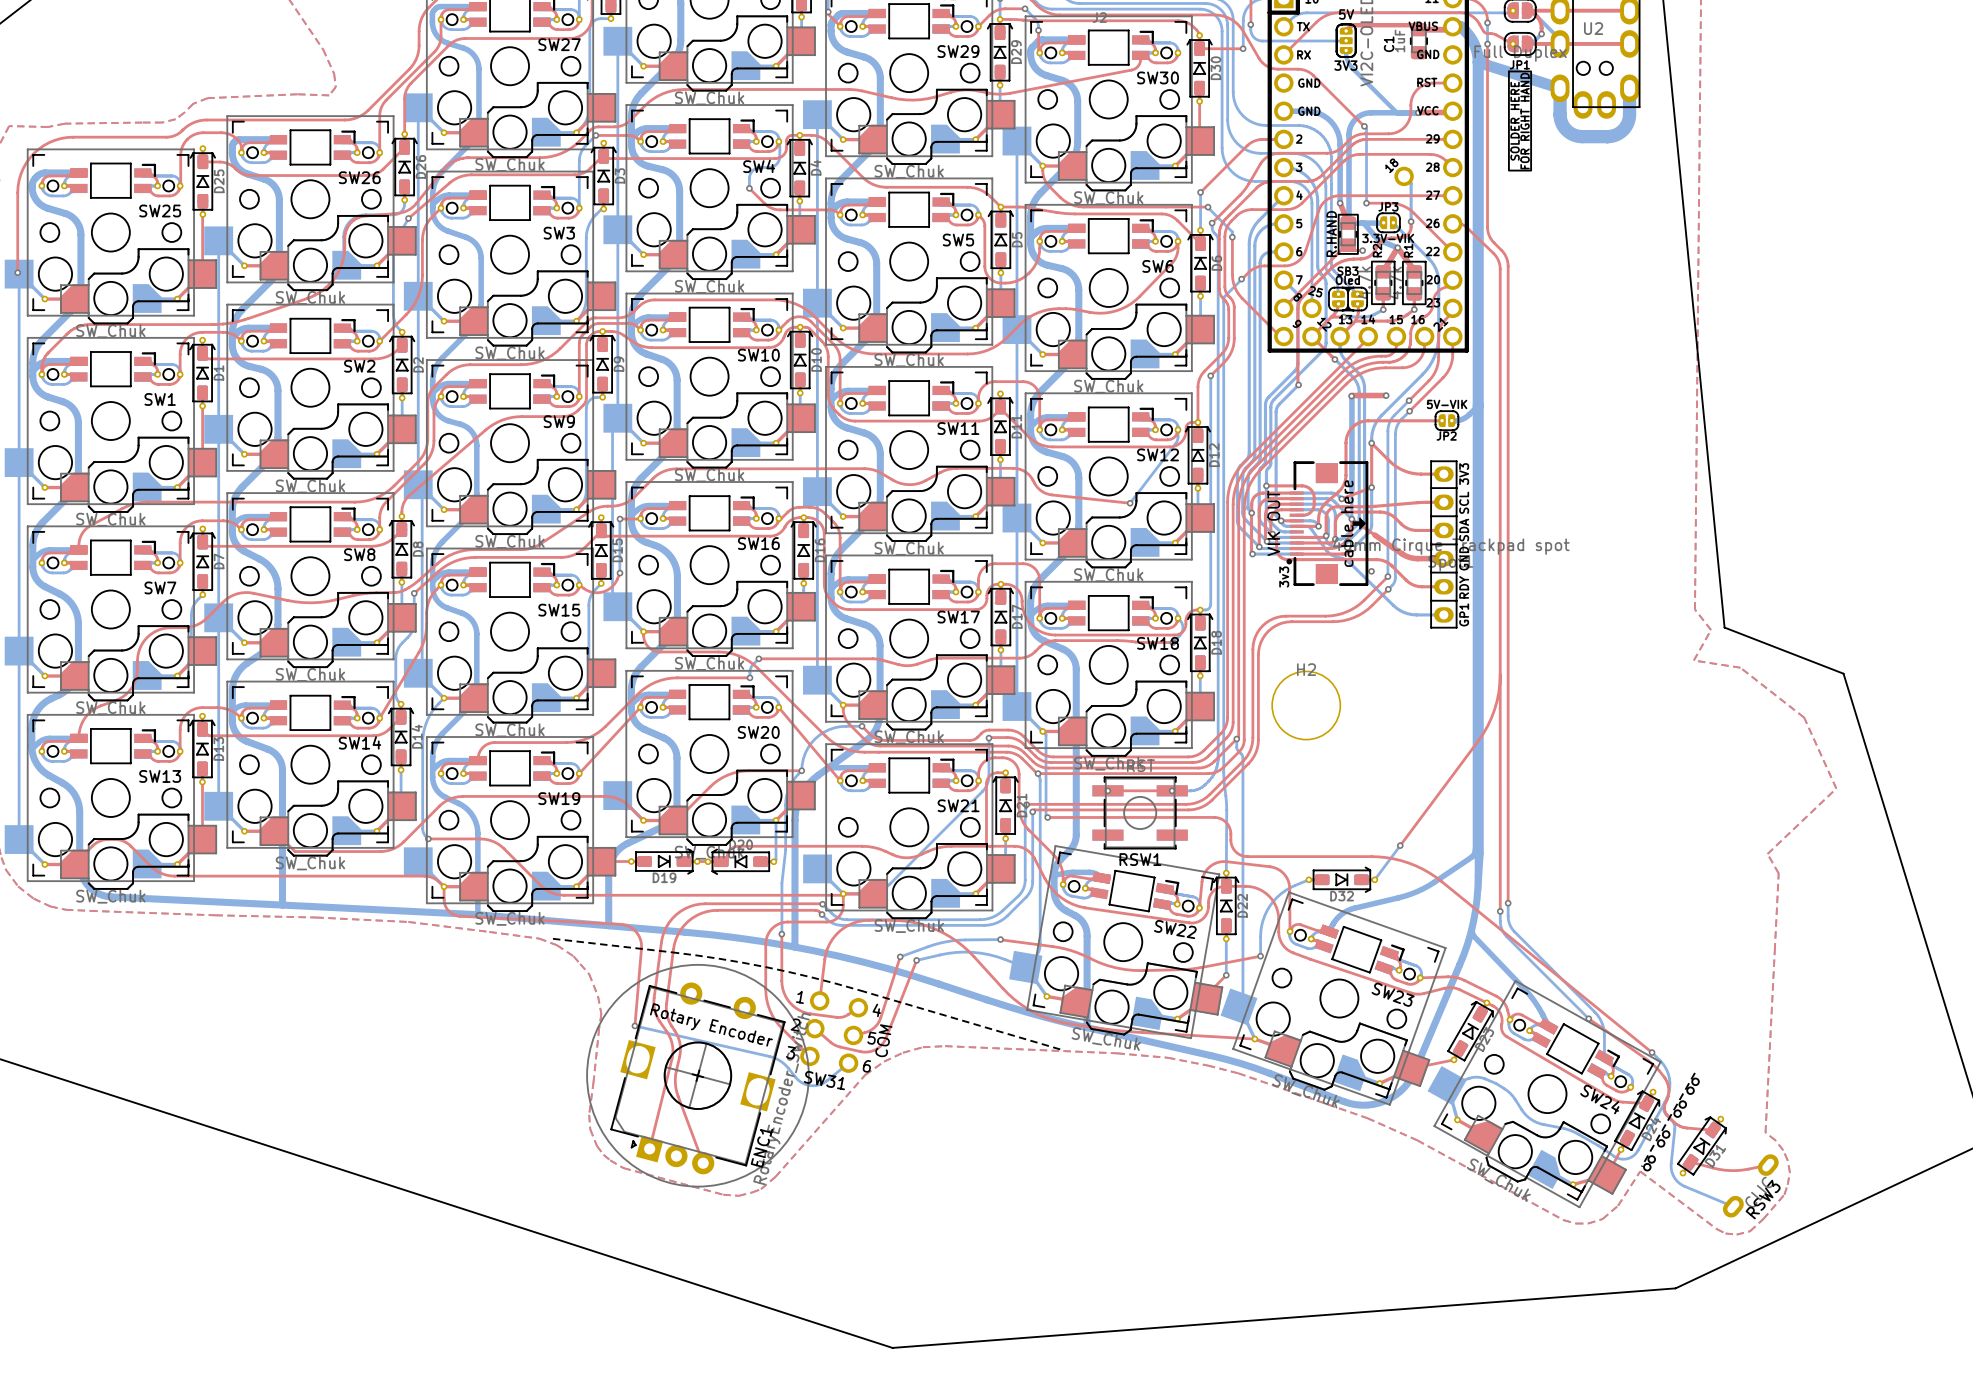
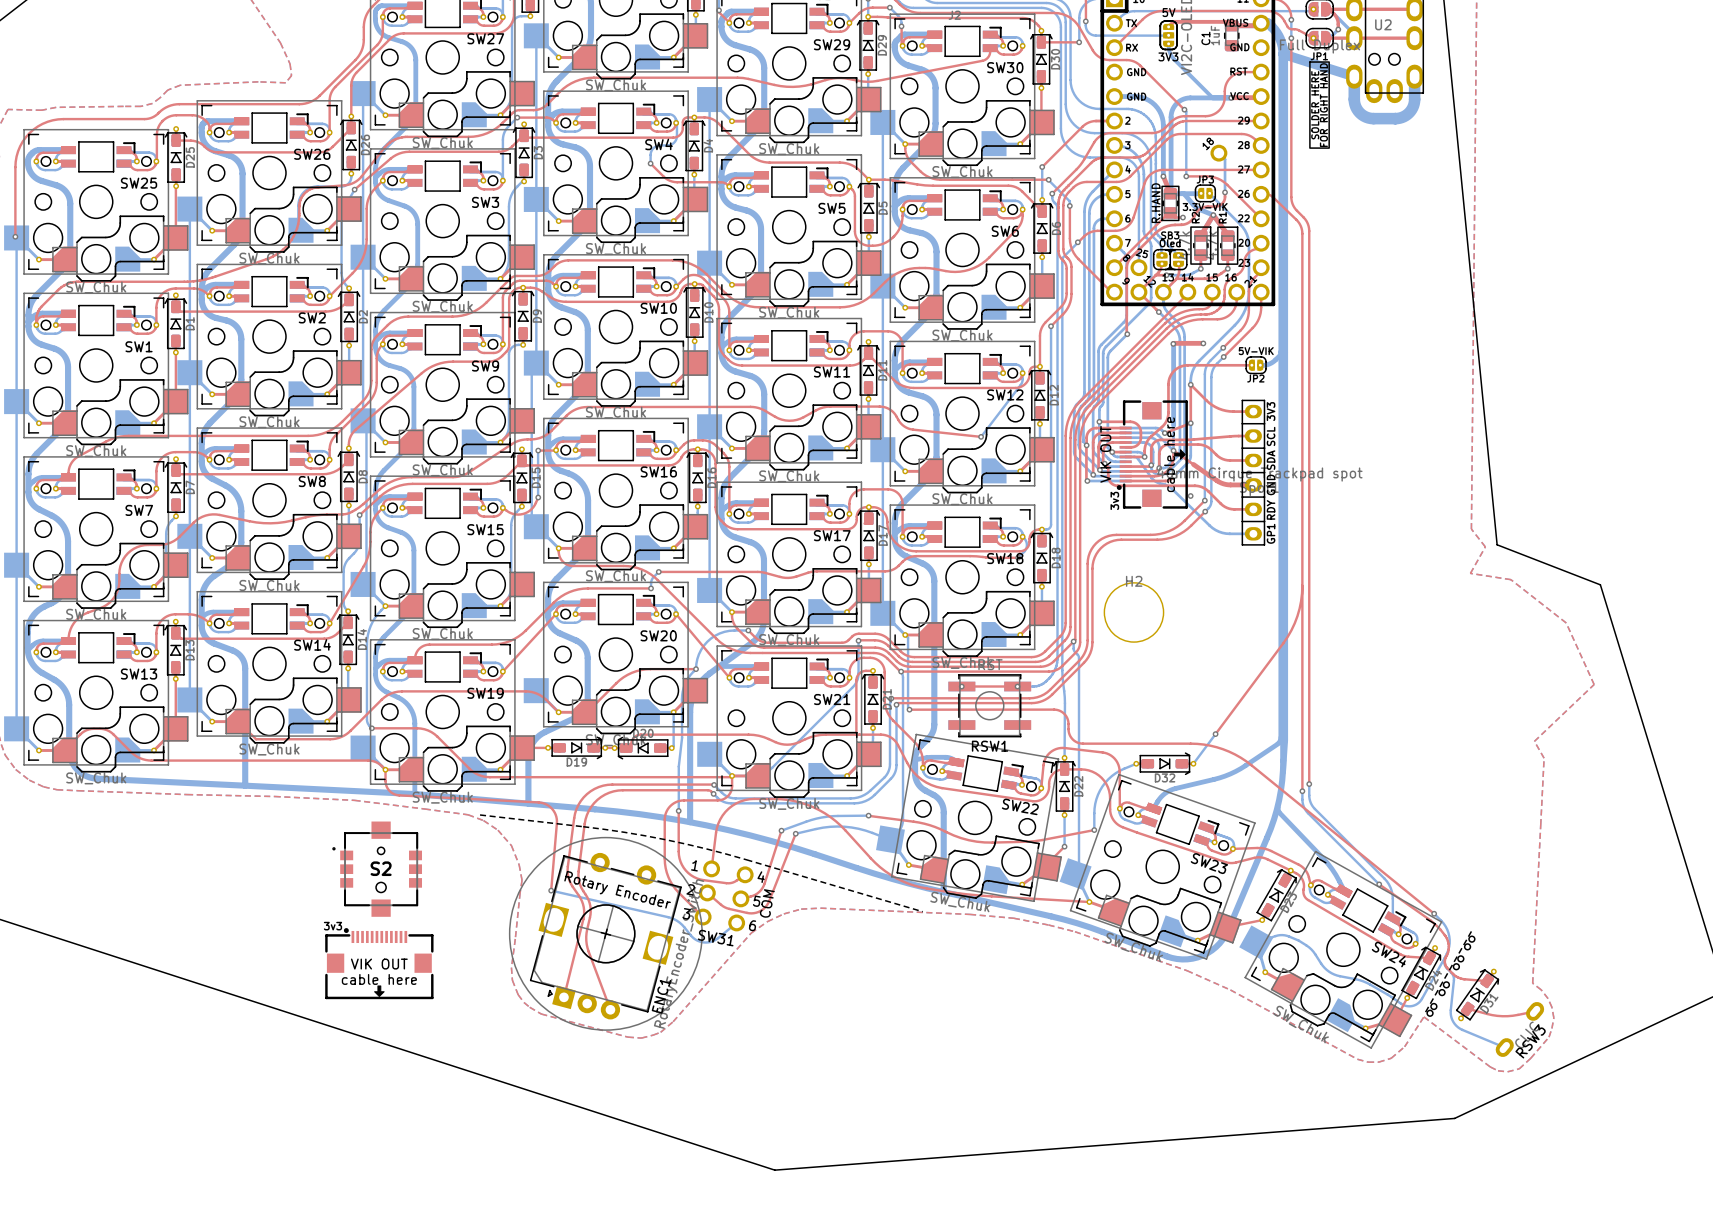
S2: none -> (377, 869)
part: none -> (379, 963)

